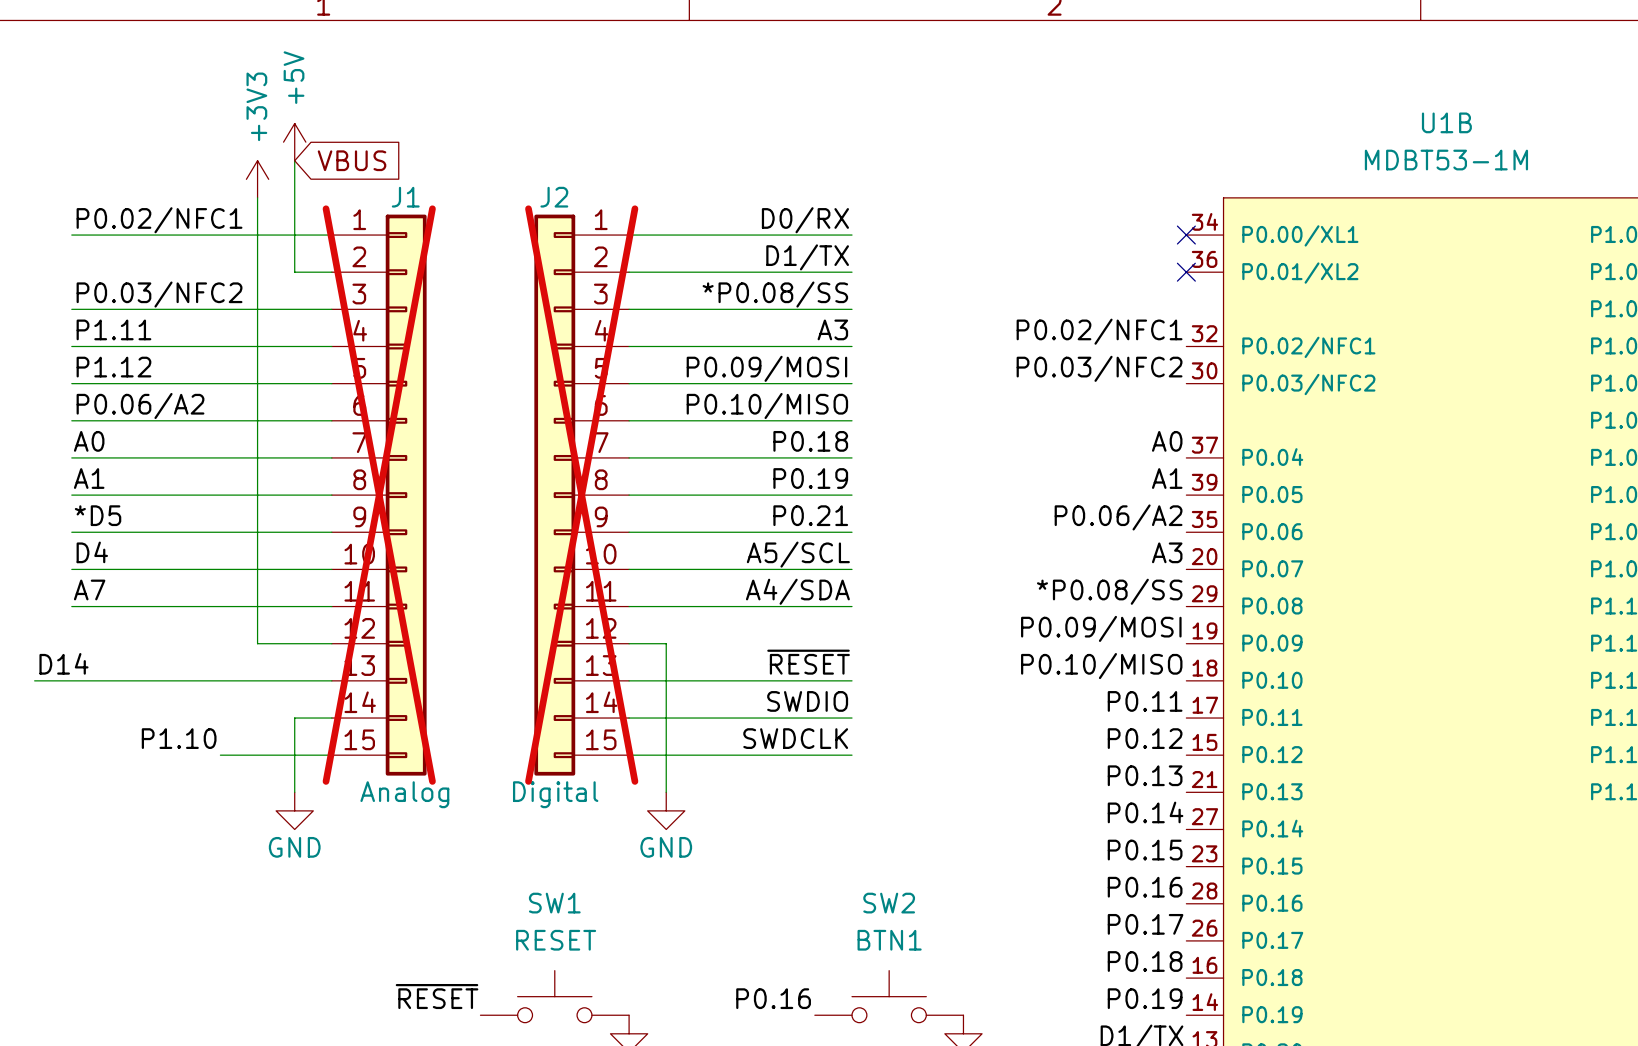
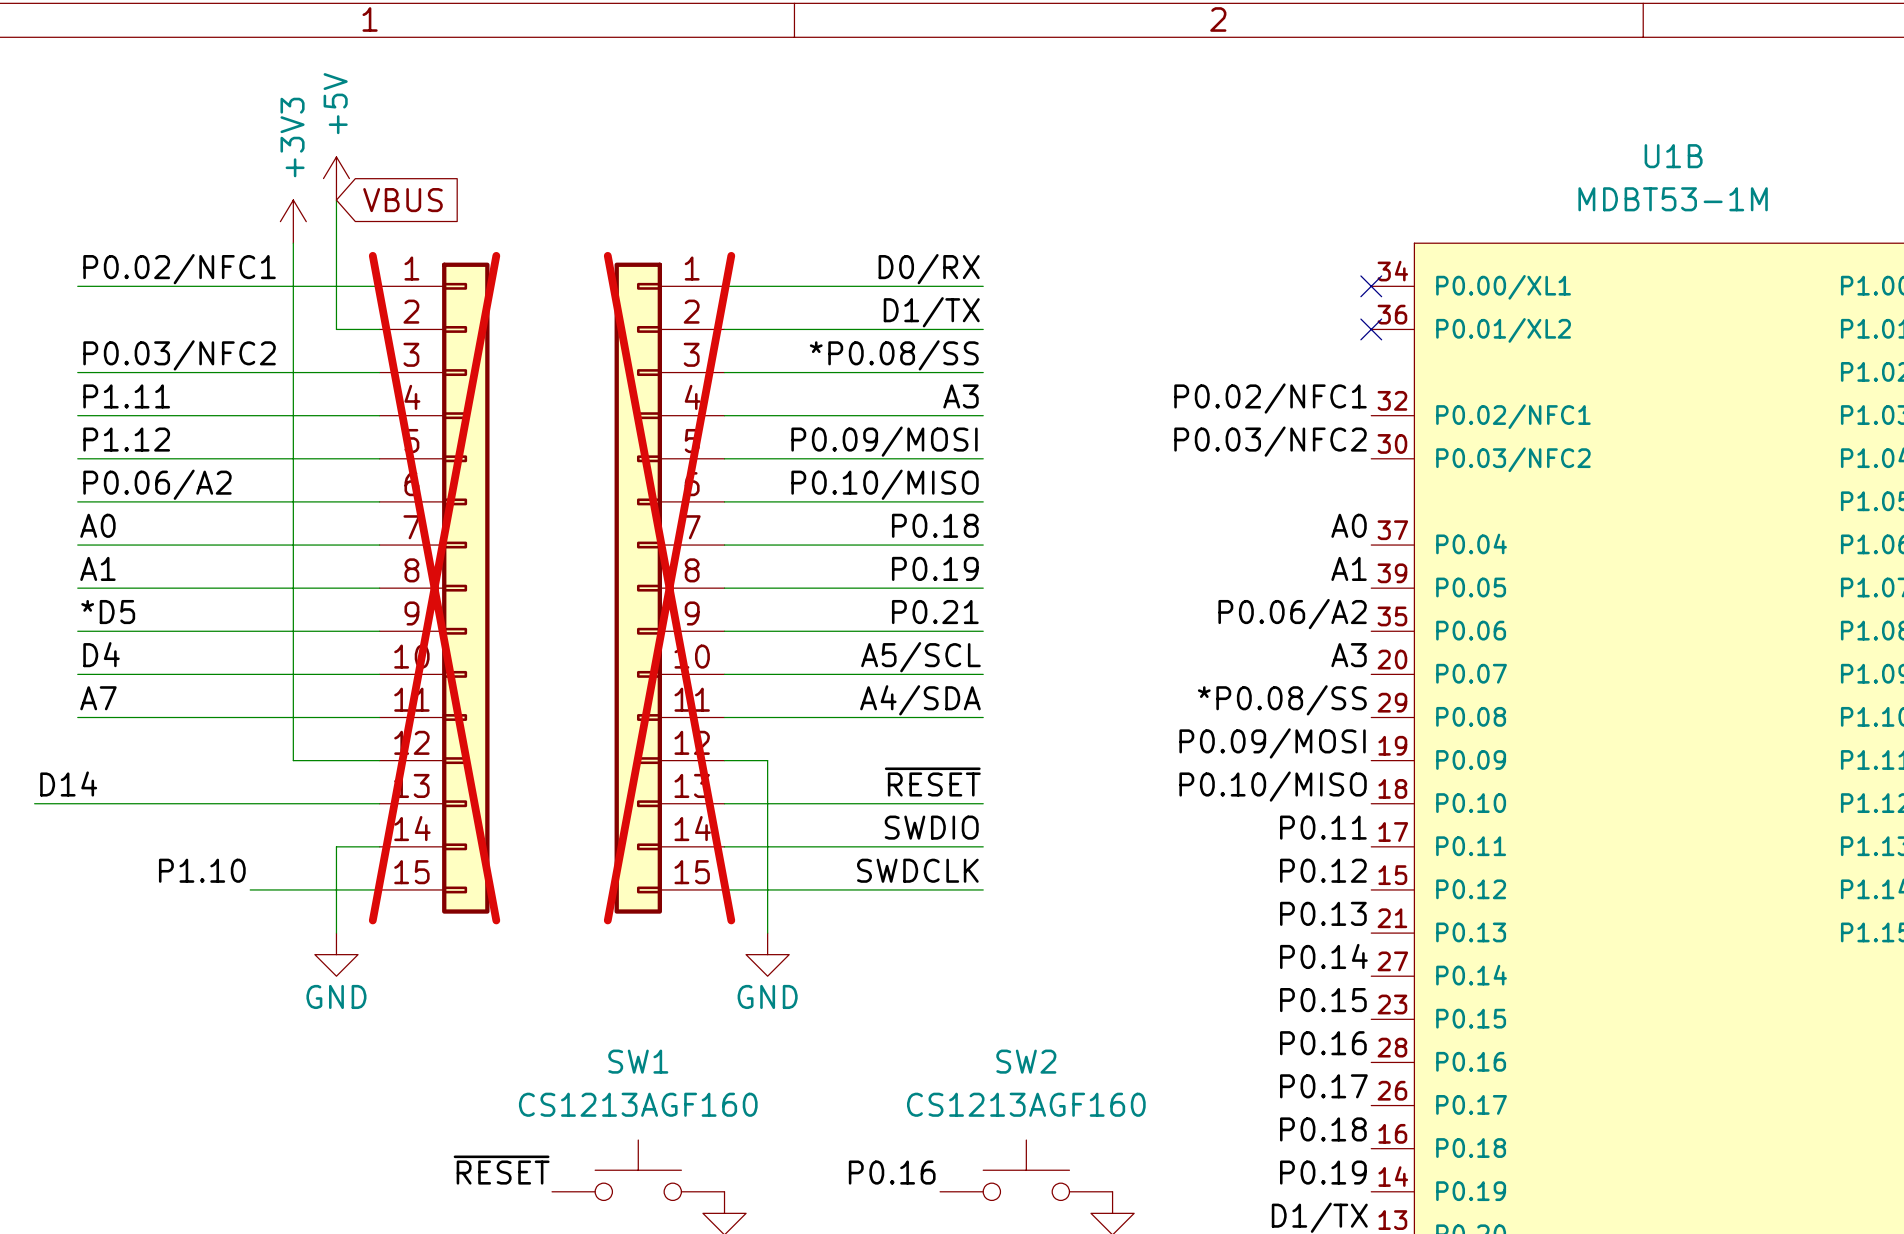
J1 name: J1 (405, 197) -> none
J2 name: J2 (554, 197) -> none
J1 value: Analog (404, 794) -> none
J2 value: Digital (555, 794) -> none
SW1 value: RESET (556, 940) -> CS1213AGF160 (638, 1104)
SW2 value: BTN1 (889, 940) -> CS1213AGF160 (1026, 1104)

